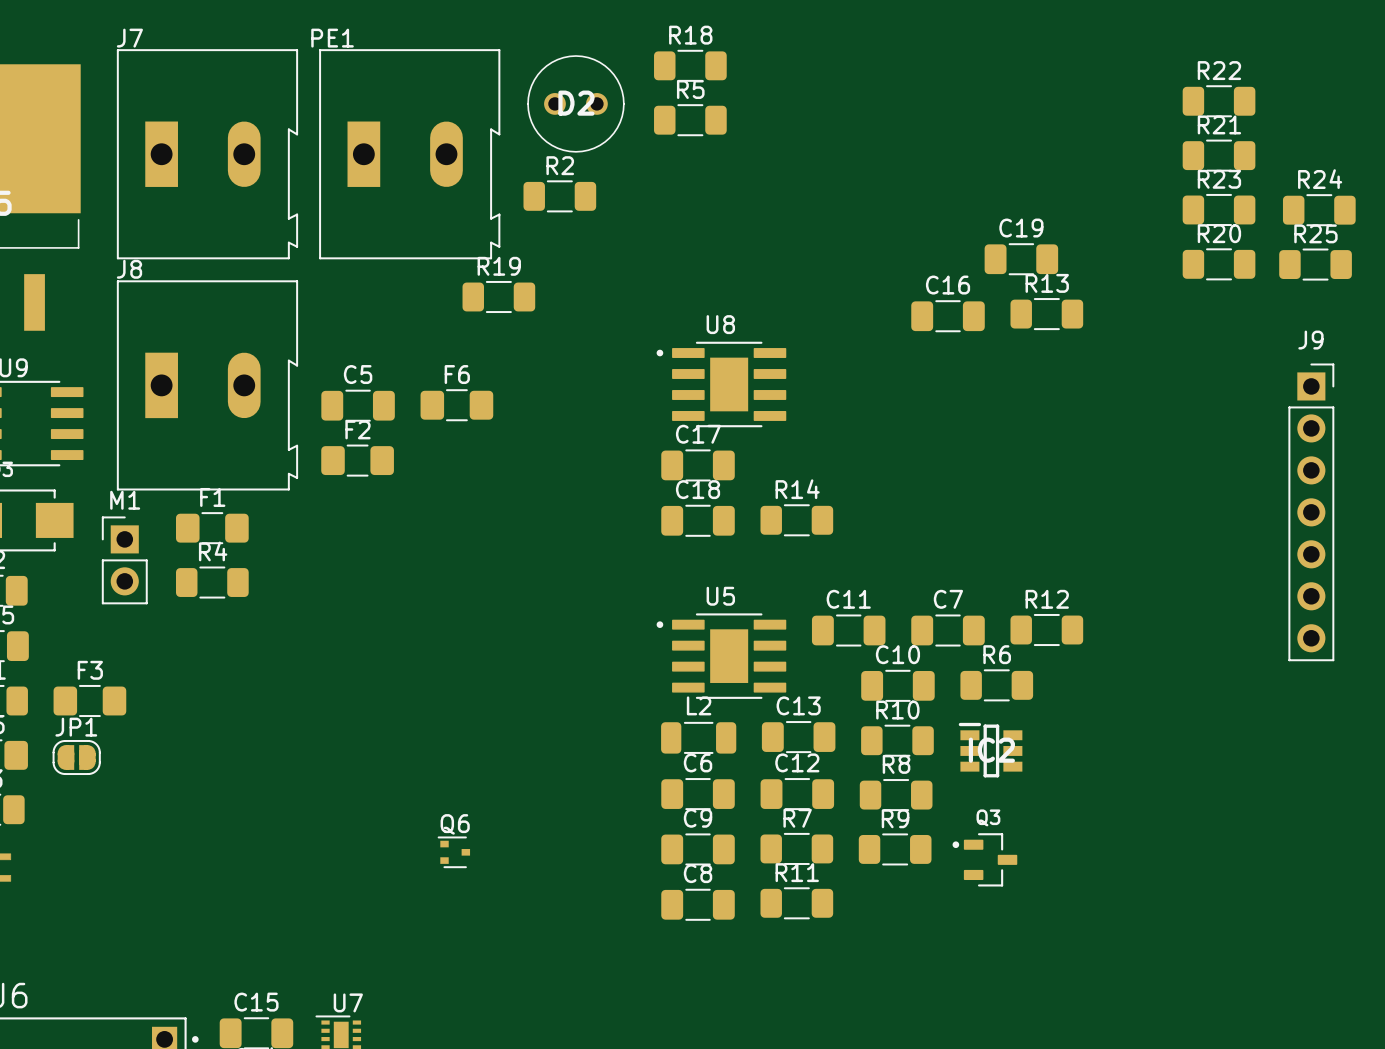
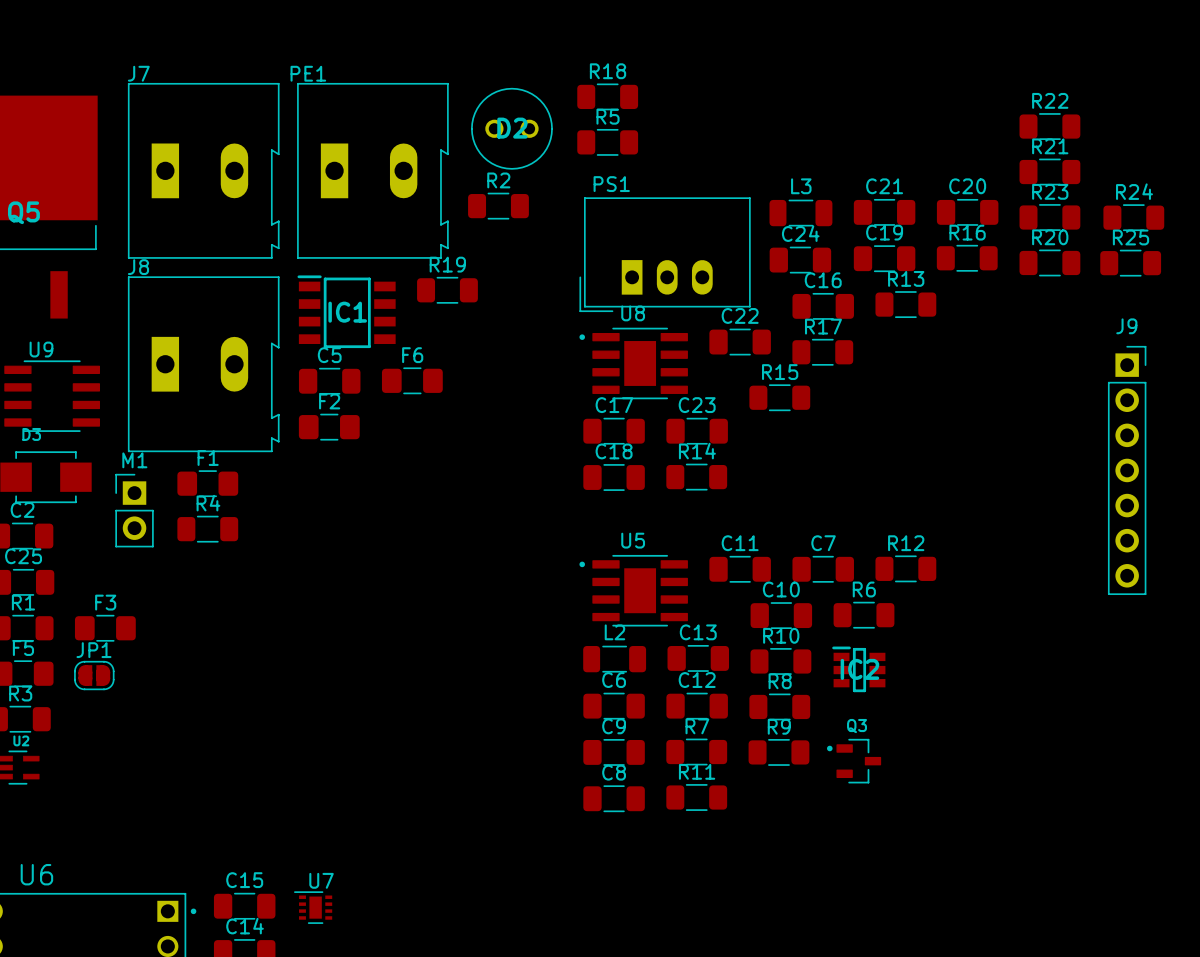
C21: none -> (884, 212)
C20: none -> (967, 212)
L3: none -> (800, 213)
PS1: none -> (665, 254)
R16: none -> (967, 258)
C24: none -> (800, 260)
IC1: none -> (346, 311)
C22: none -> (740, 342)
R17: none -> (822, 352)
R15: none -> (779, 397)
C23: none -> (697, 431)
Q6: (453, 852) -> none

